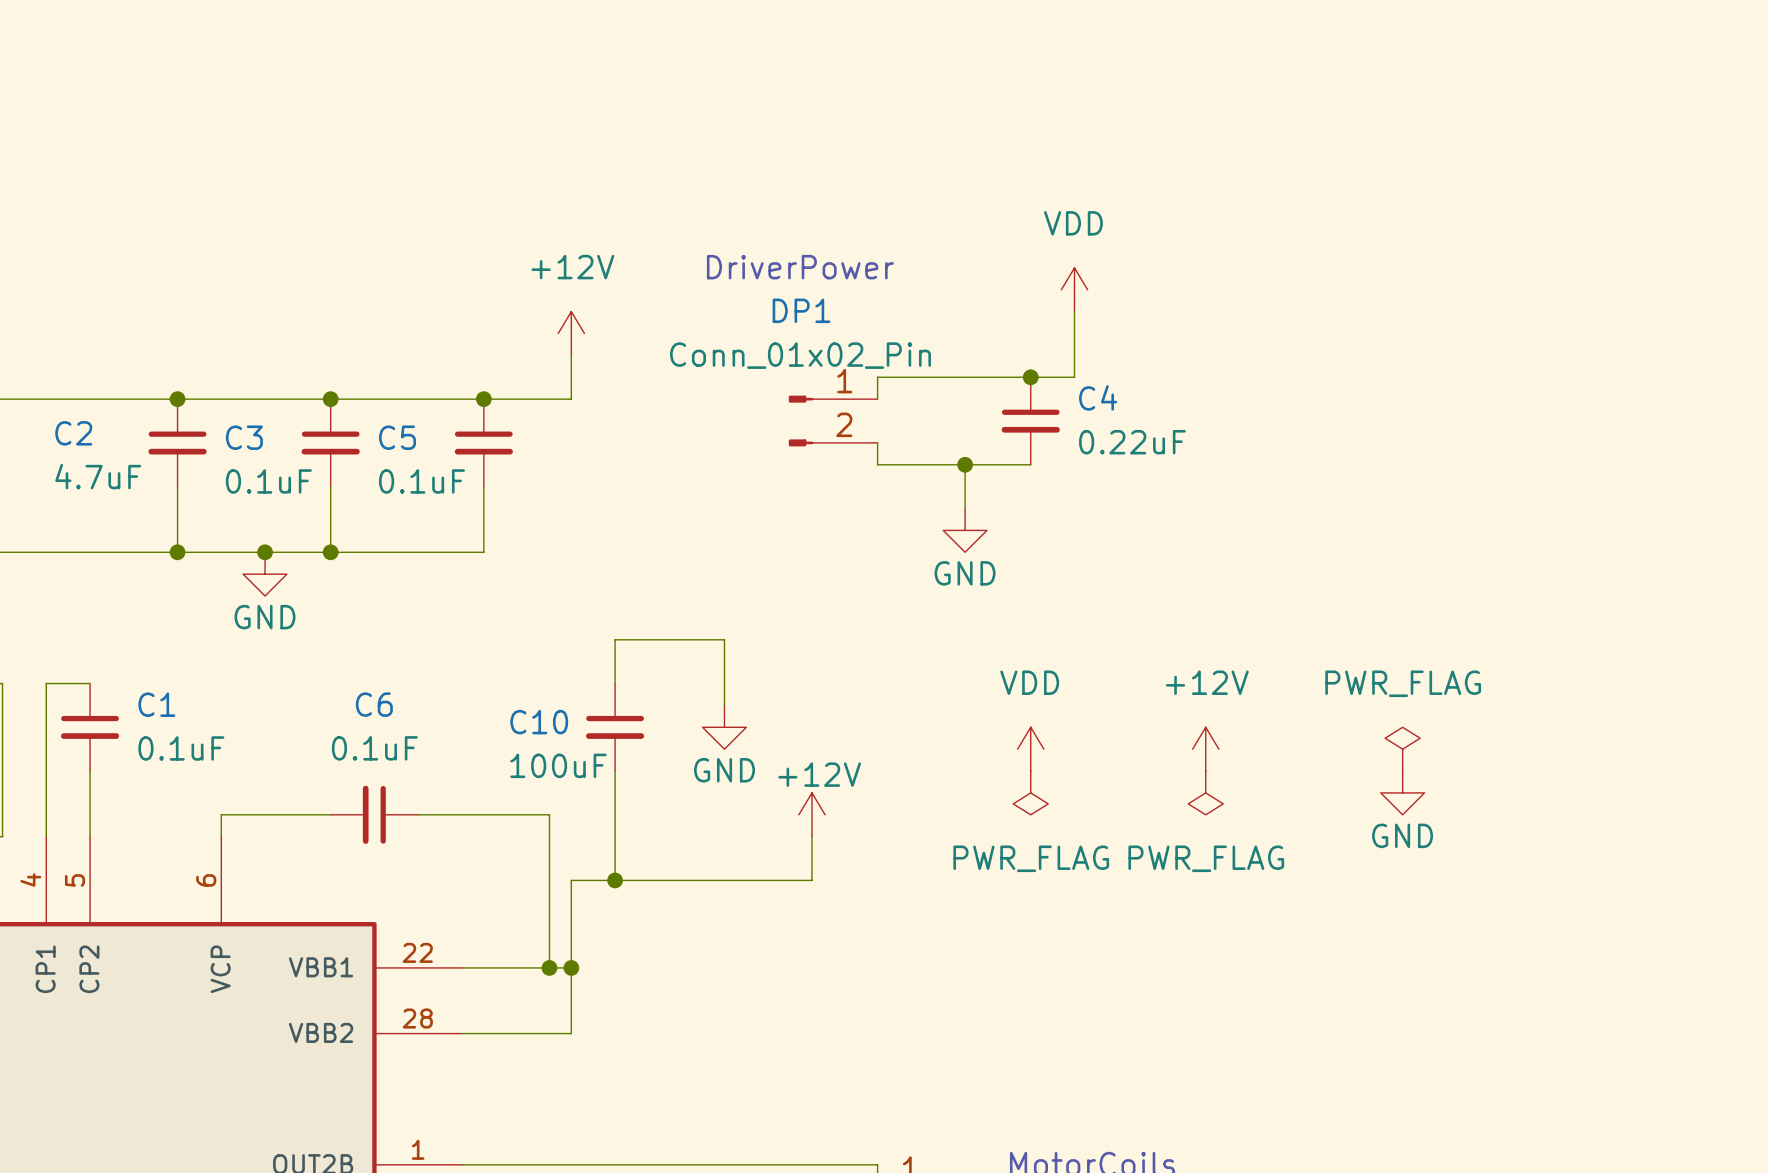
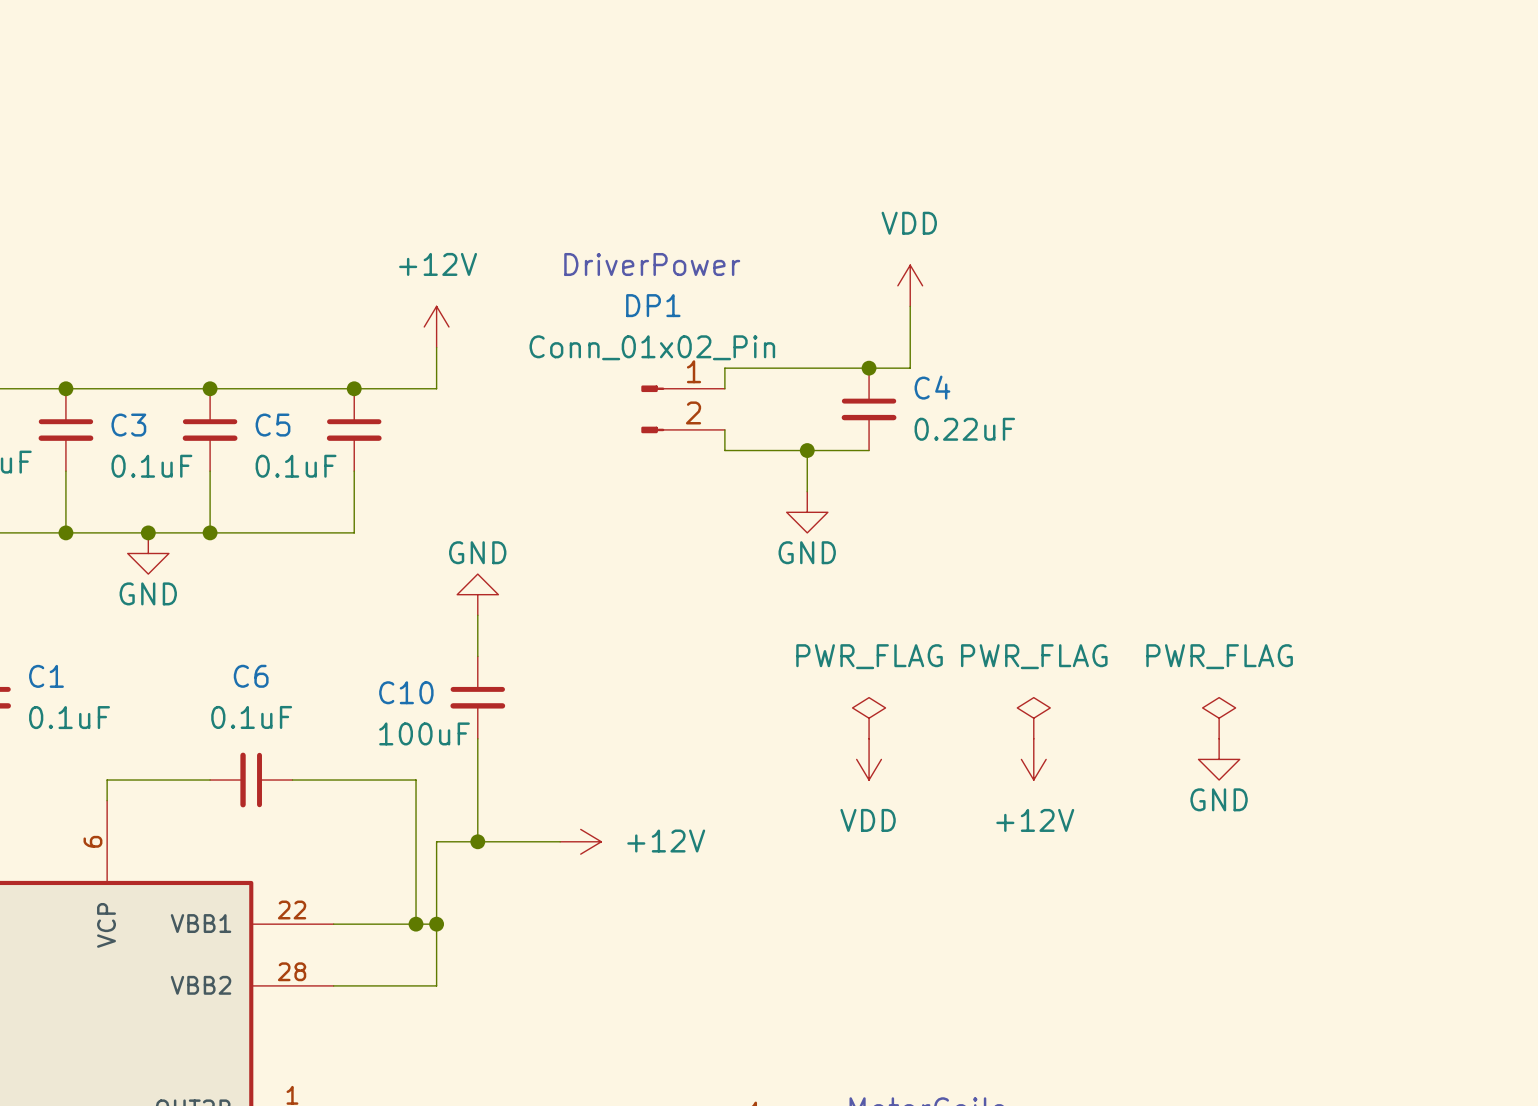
wire: (615, 639) (724, 639) (724, 705) -> none
power symbol rotation: 0° (724, 727) -> 180° (477, 594)
power symbol position: GND (724, 727) -> GND (477, 594)
power symbol: VDD (1030, 749) -> PWR_FLAG (869, 718)
power symbol: +12V (1205, 749) -> PWR_FLAG (1033, 718)
power symbol text position: +12V (819, 774) -> +12V (666, 841)
power symbol: PWR_FLAG (1030, 792) -> VDD (869, 759)
power symbol: PWR_FLAG (1205, 792) -> +12V (1033, 759)
power symbol rotation: 0° (811, 814) -> 90° clockwise (580, 841)
power symbol position: +12V (811, 814) -> +12V (580, 841)
wire: (811, 836) (811, 880) (702, 880) -> none

